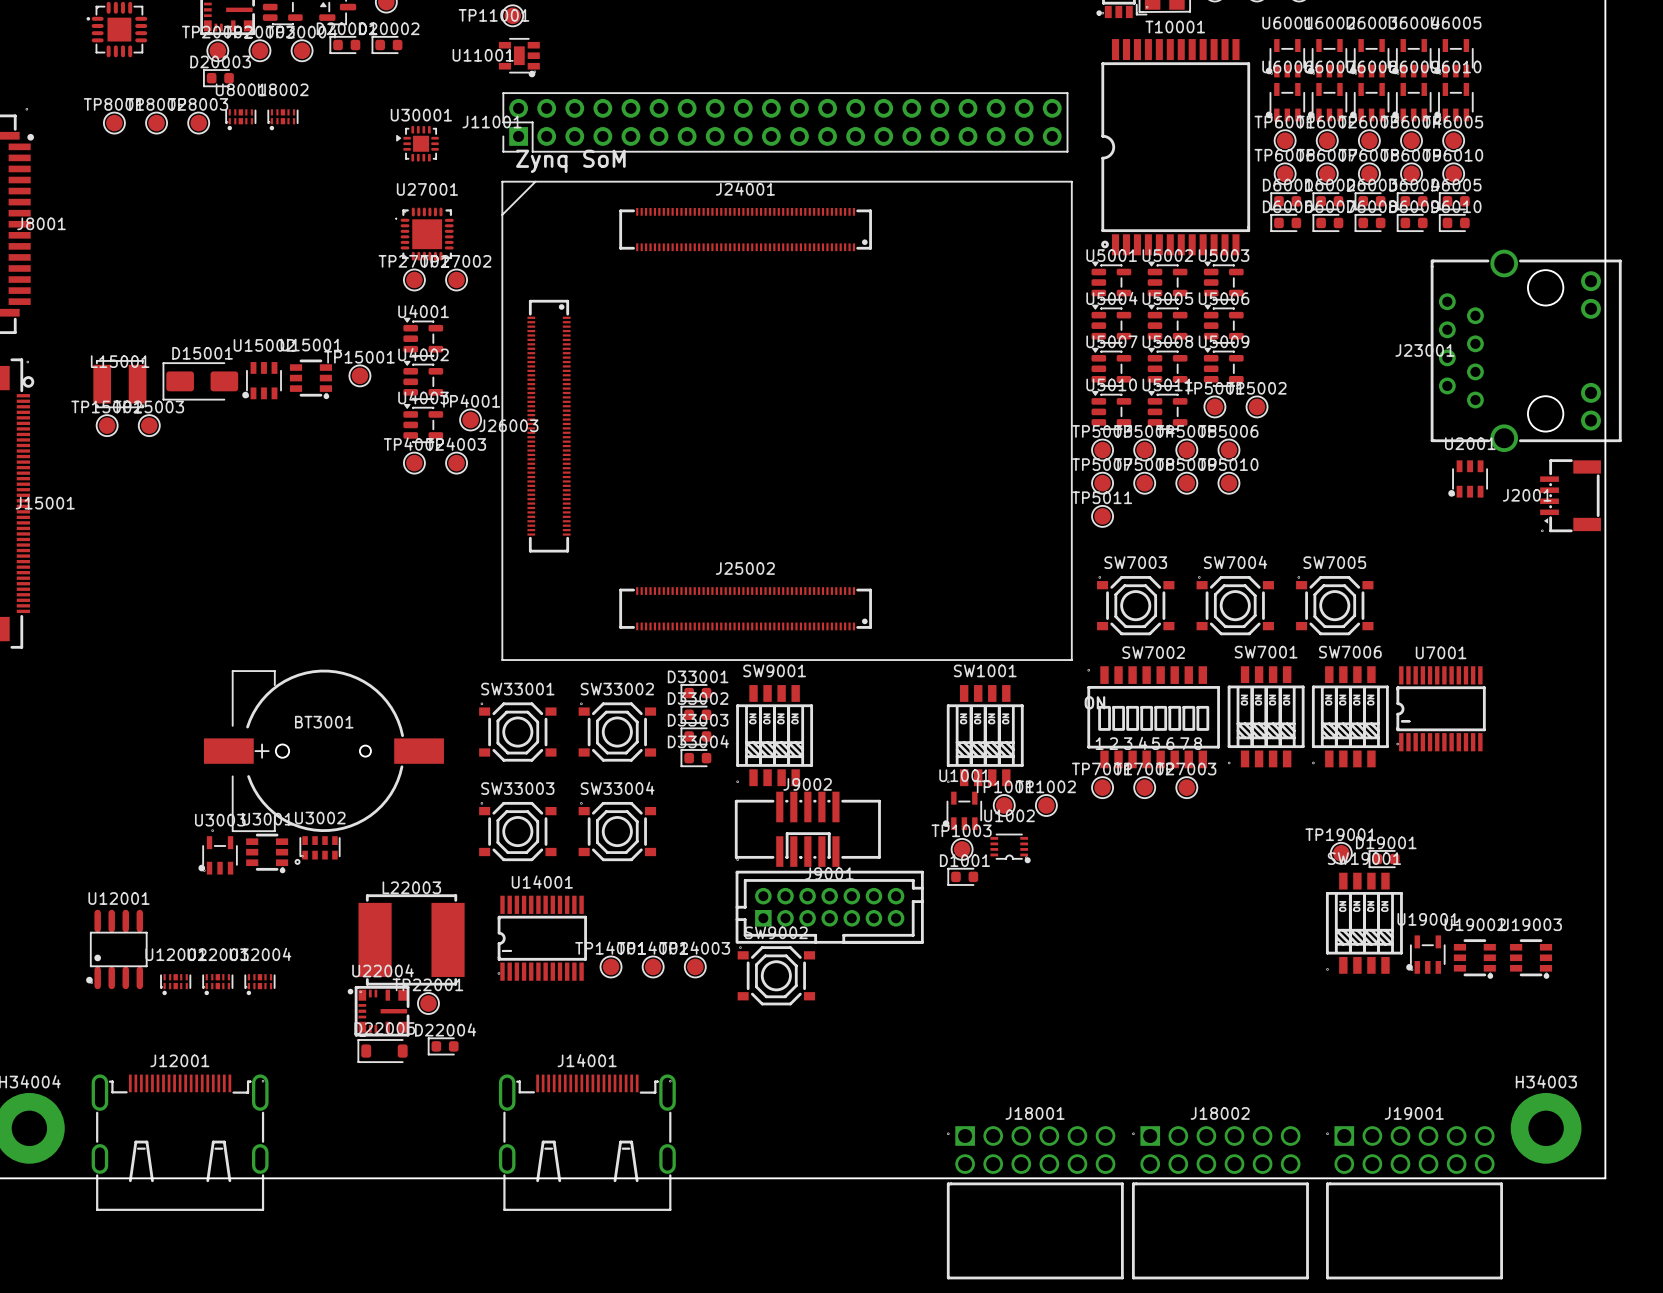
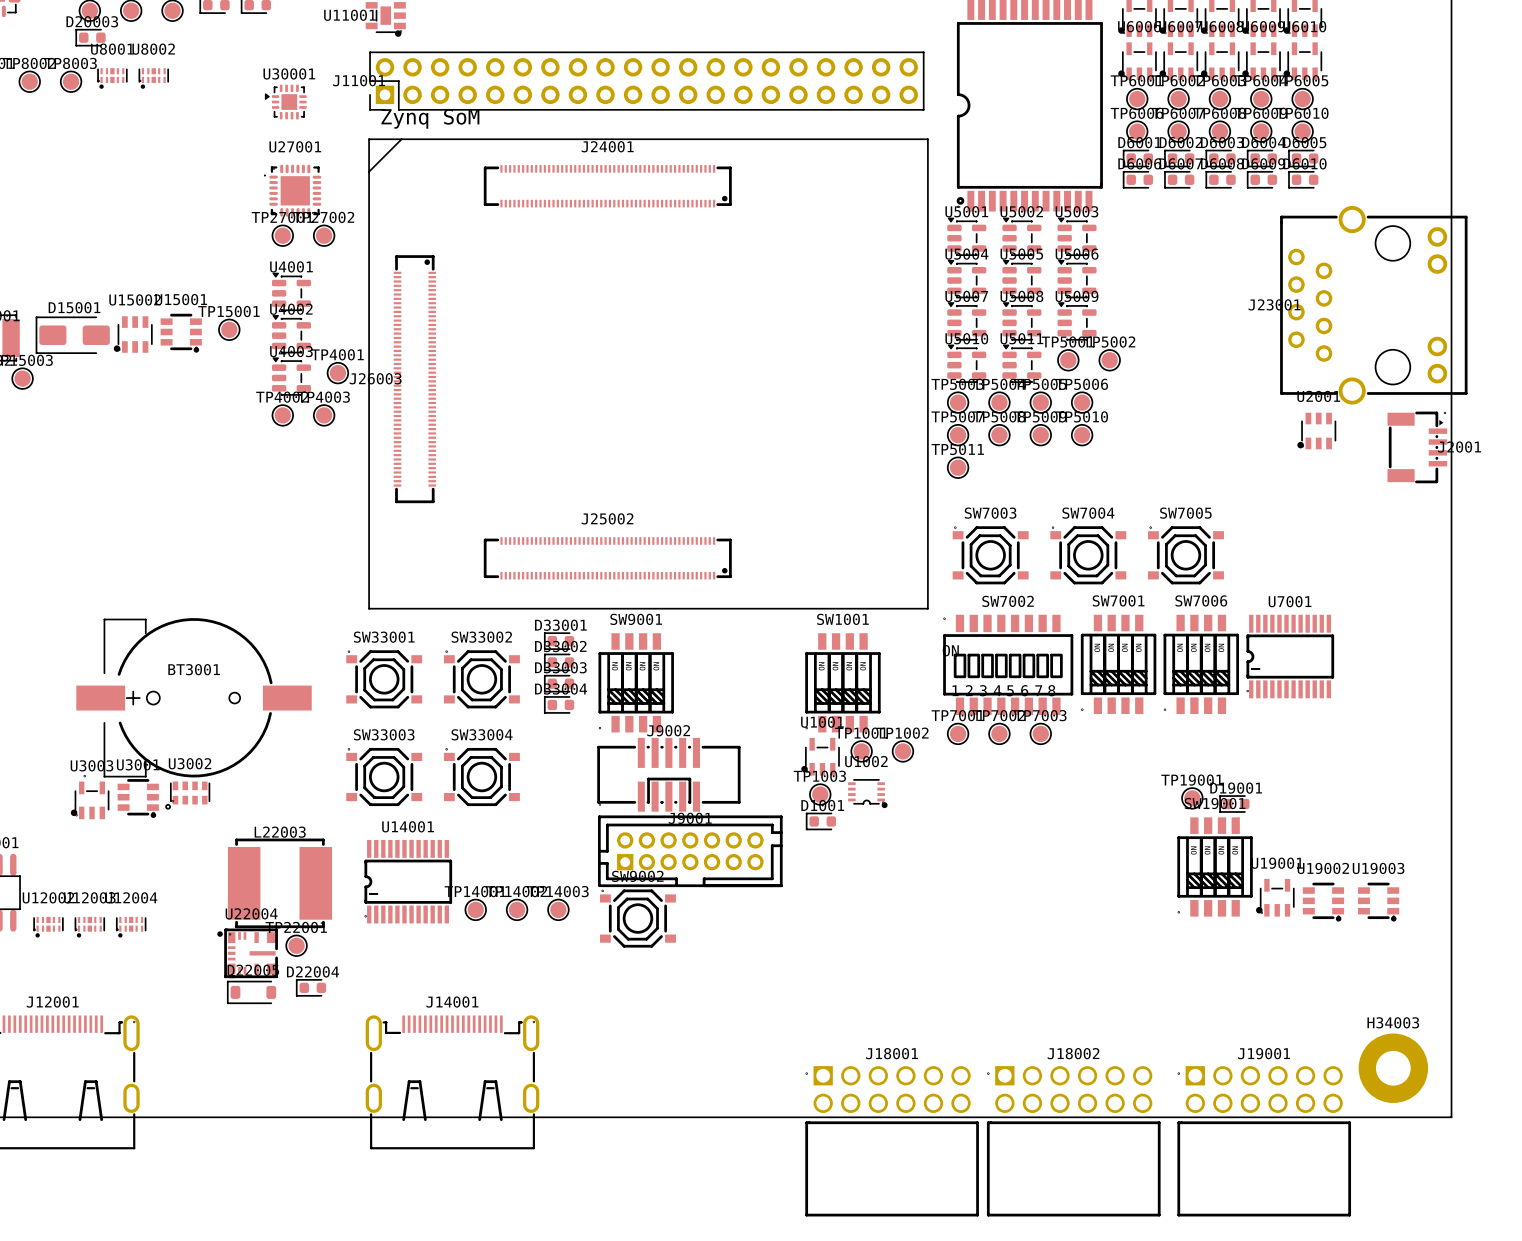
J2001 rotation: 0° (1570, 495) -> 180° (1417, 447)

